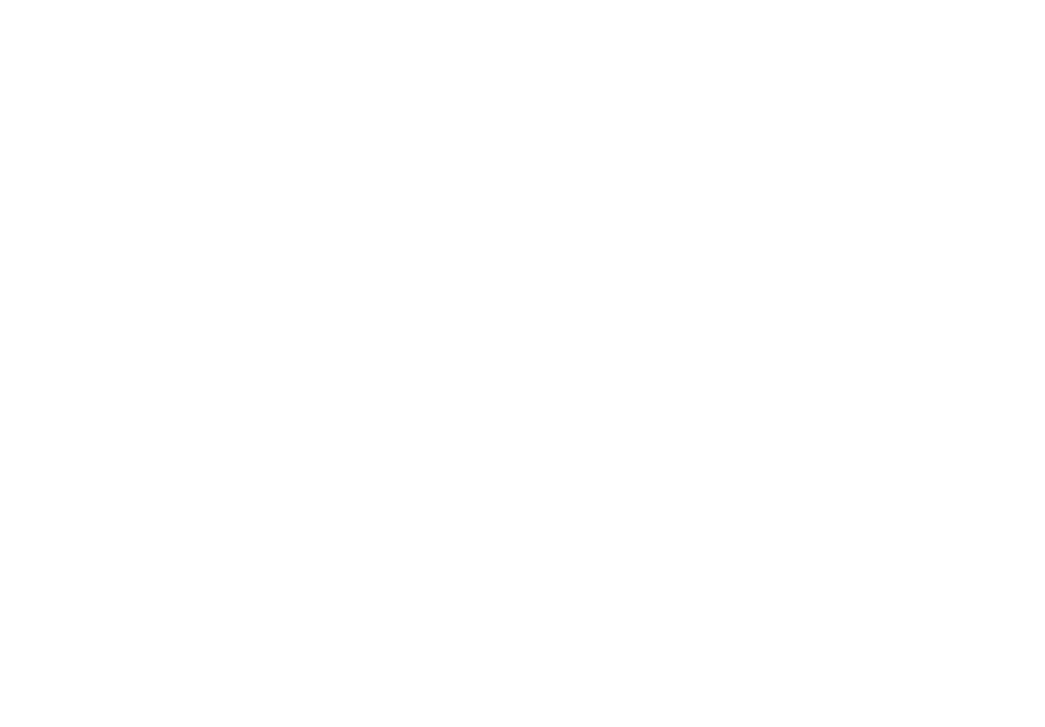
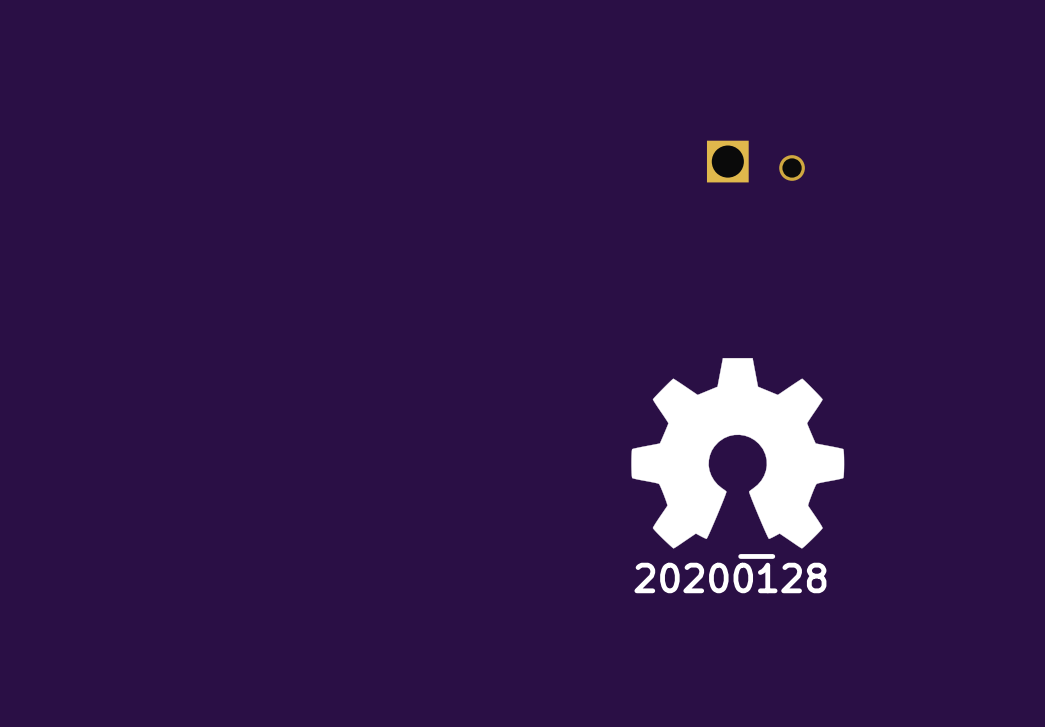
part: none -> (727, 161)
via: none -> (792, 167)
drawing: none -> [631, 358, 845, 559]

